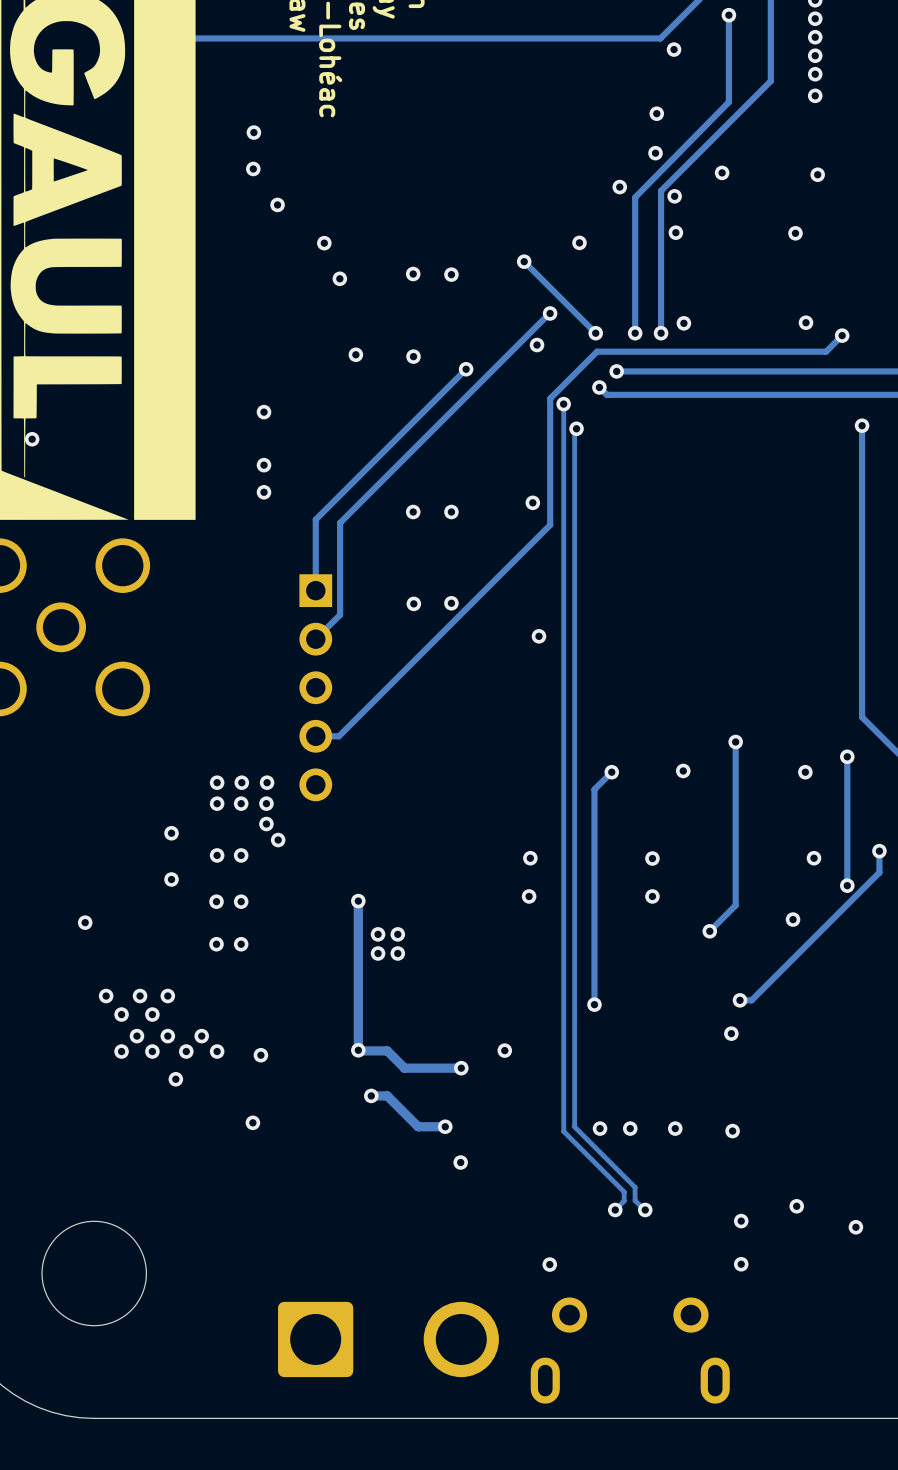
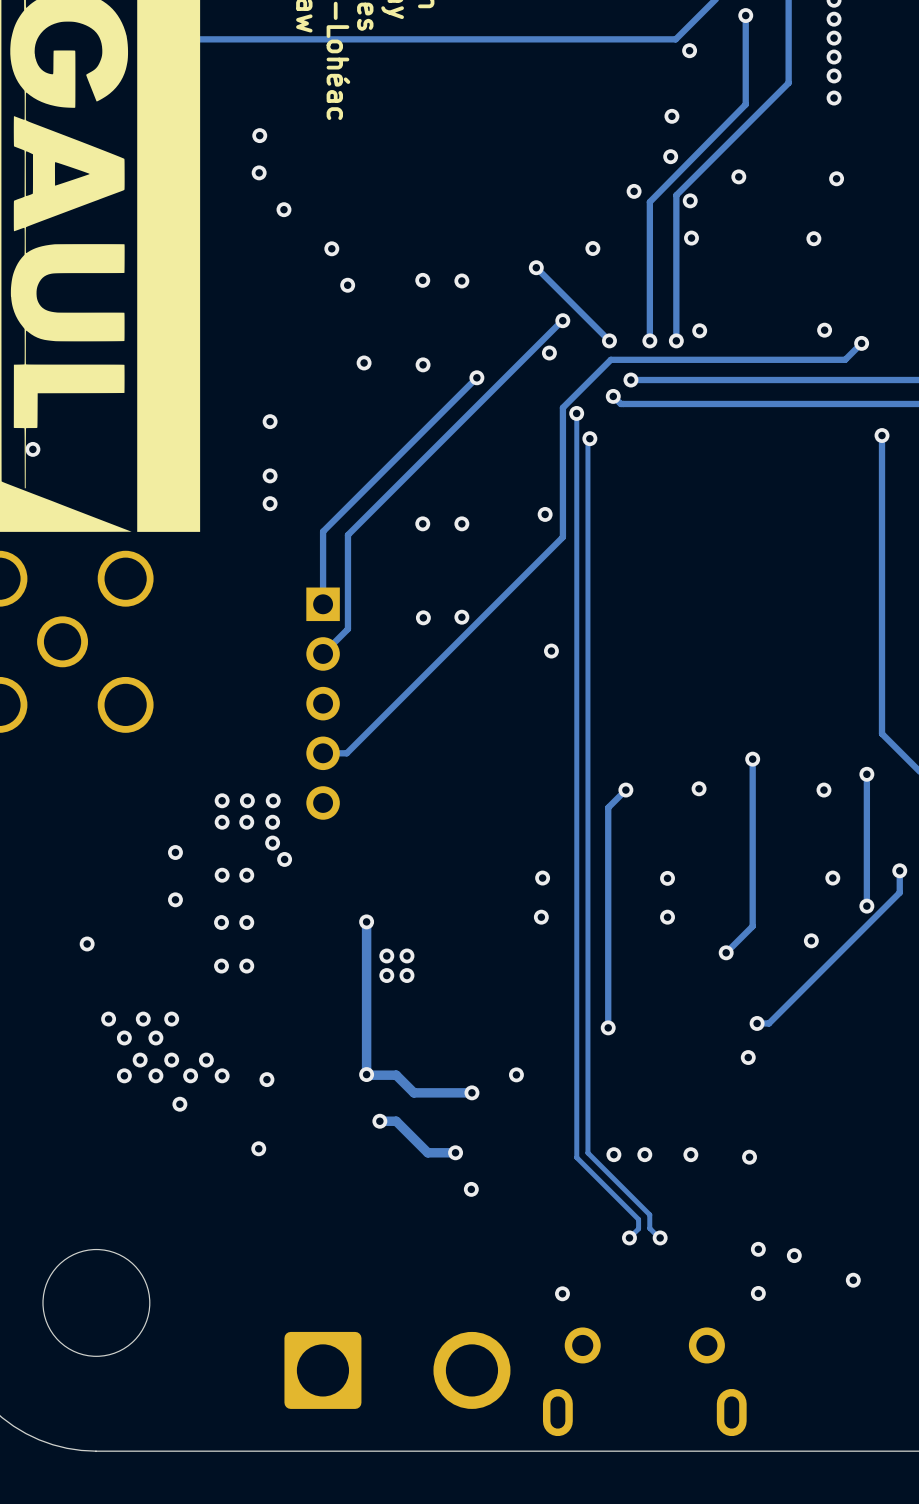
via: (796, 1206) -> none
via: none -> (794, 1255)
via: (855, 1227) -> none
via: none -> (853, 1280)

